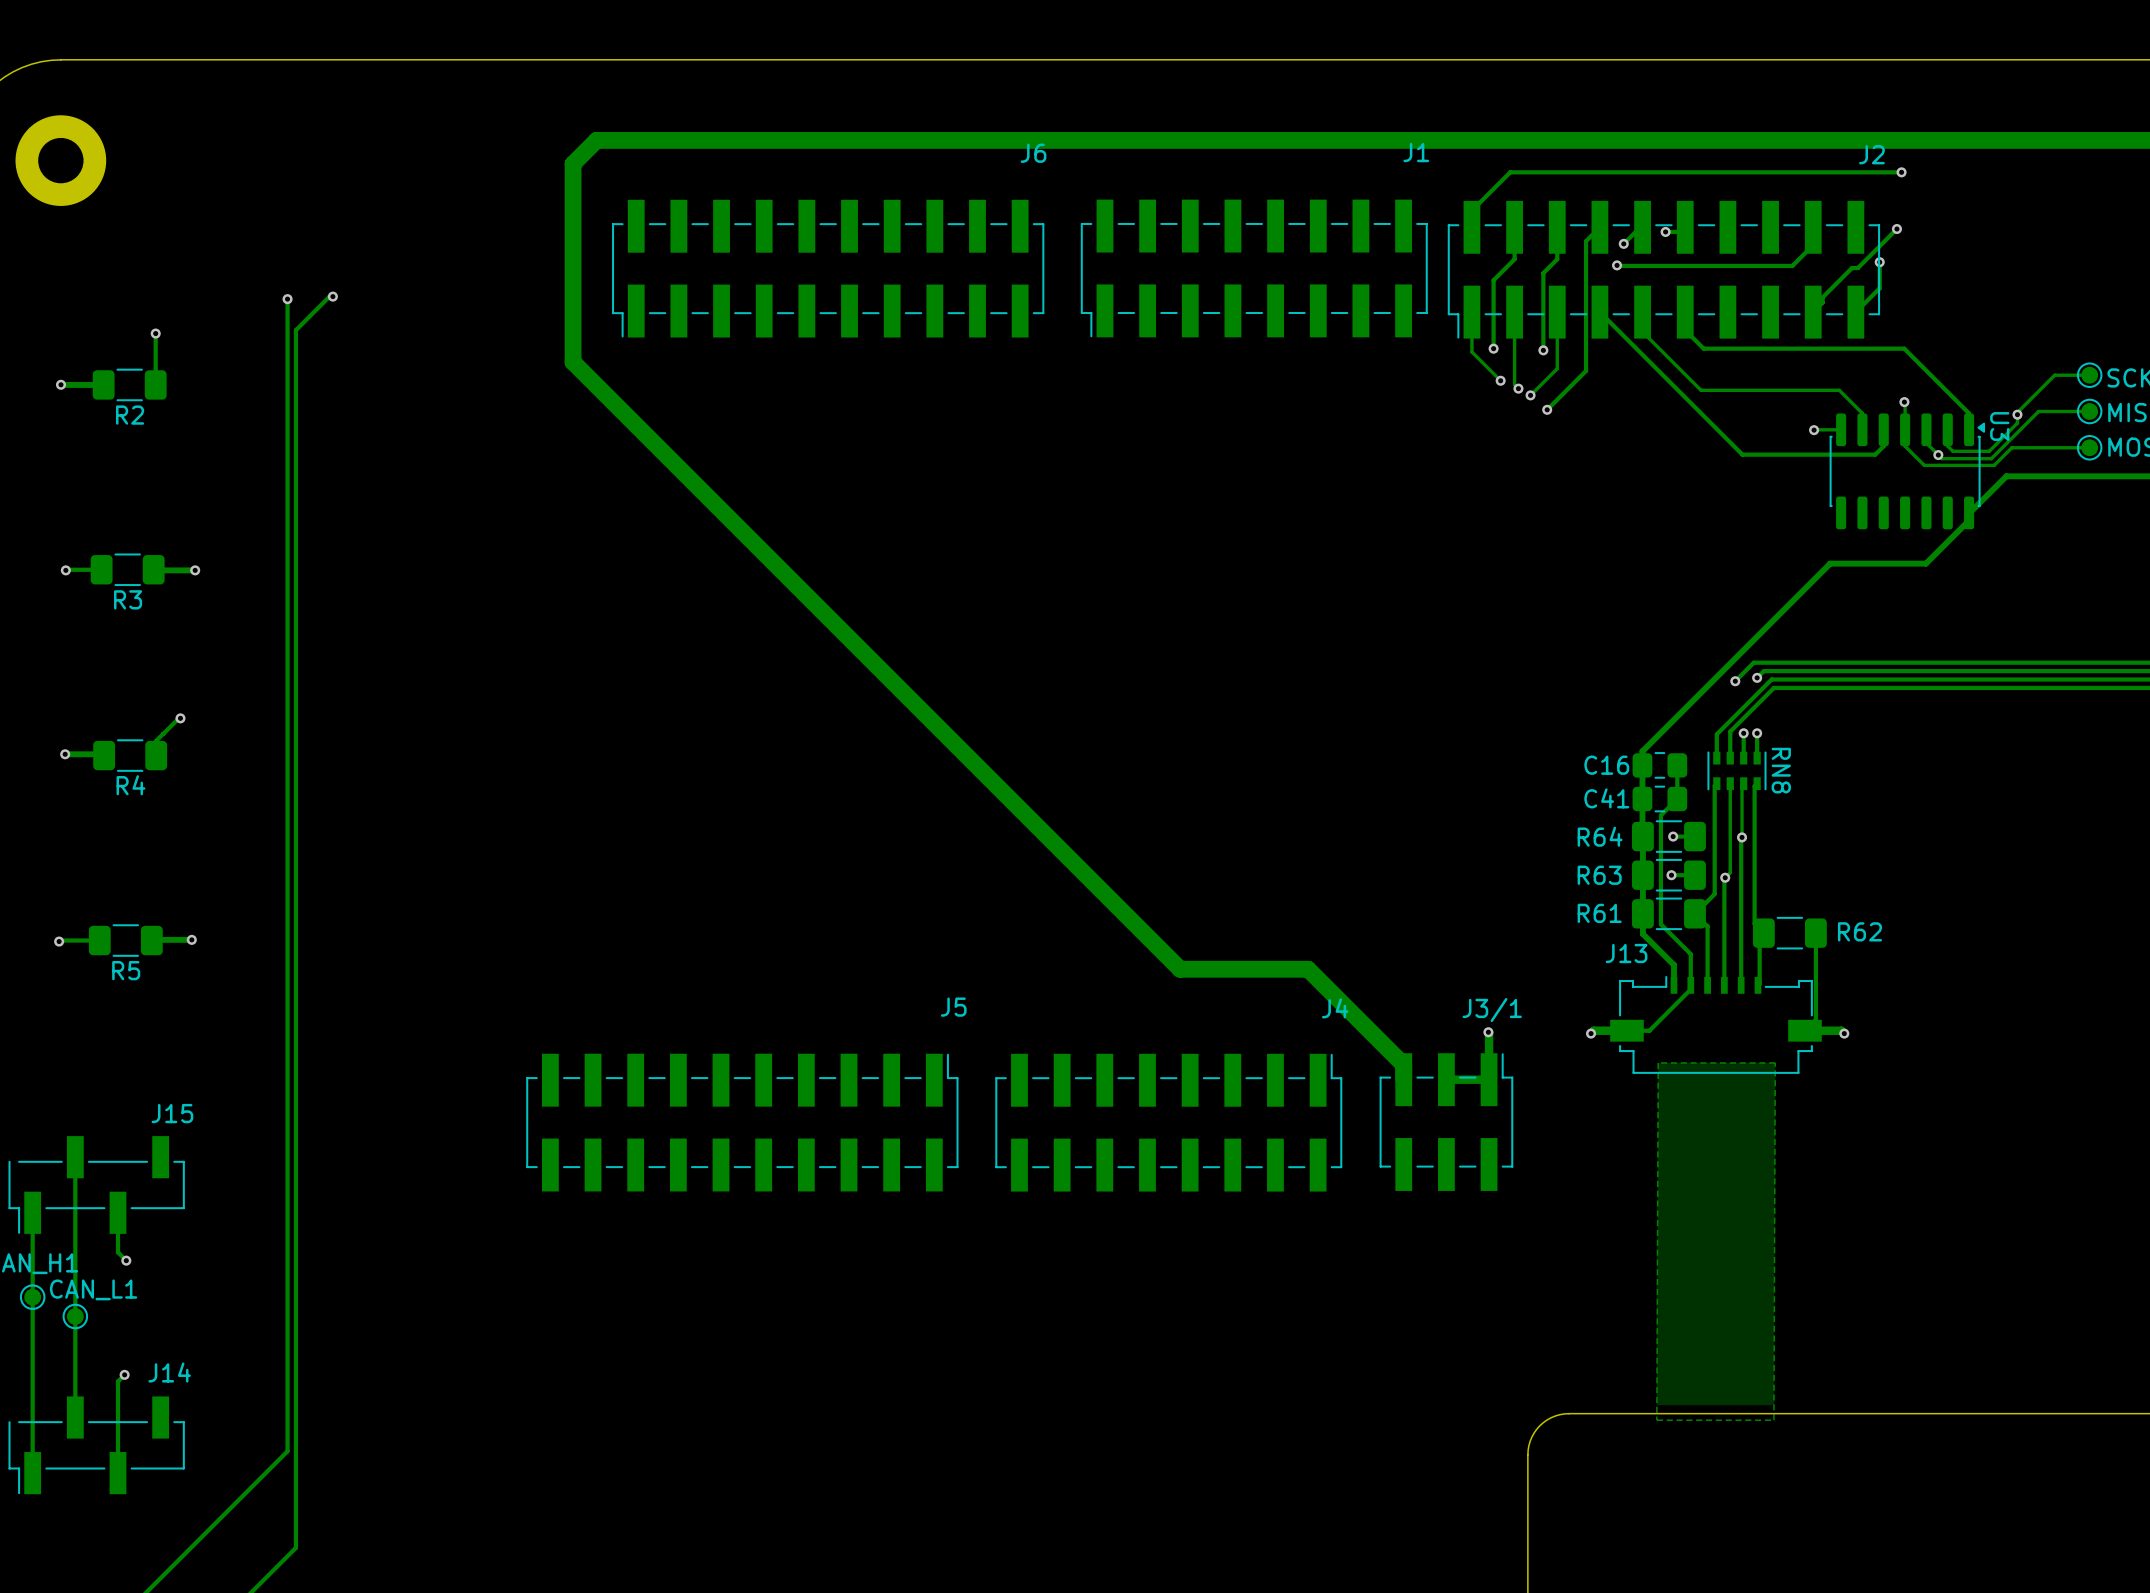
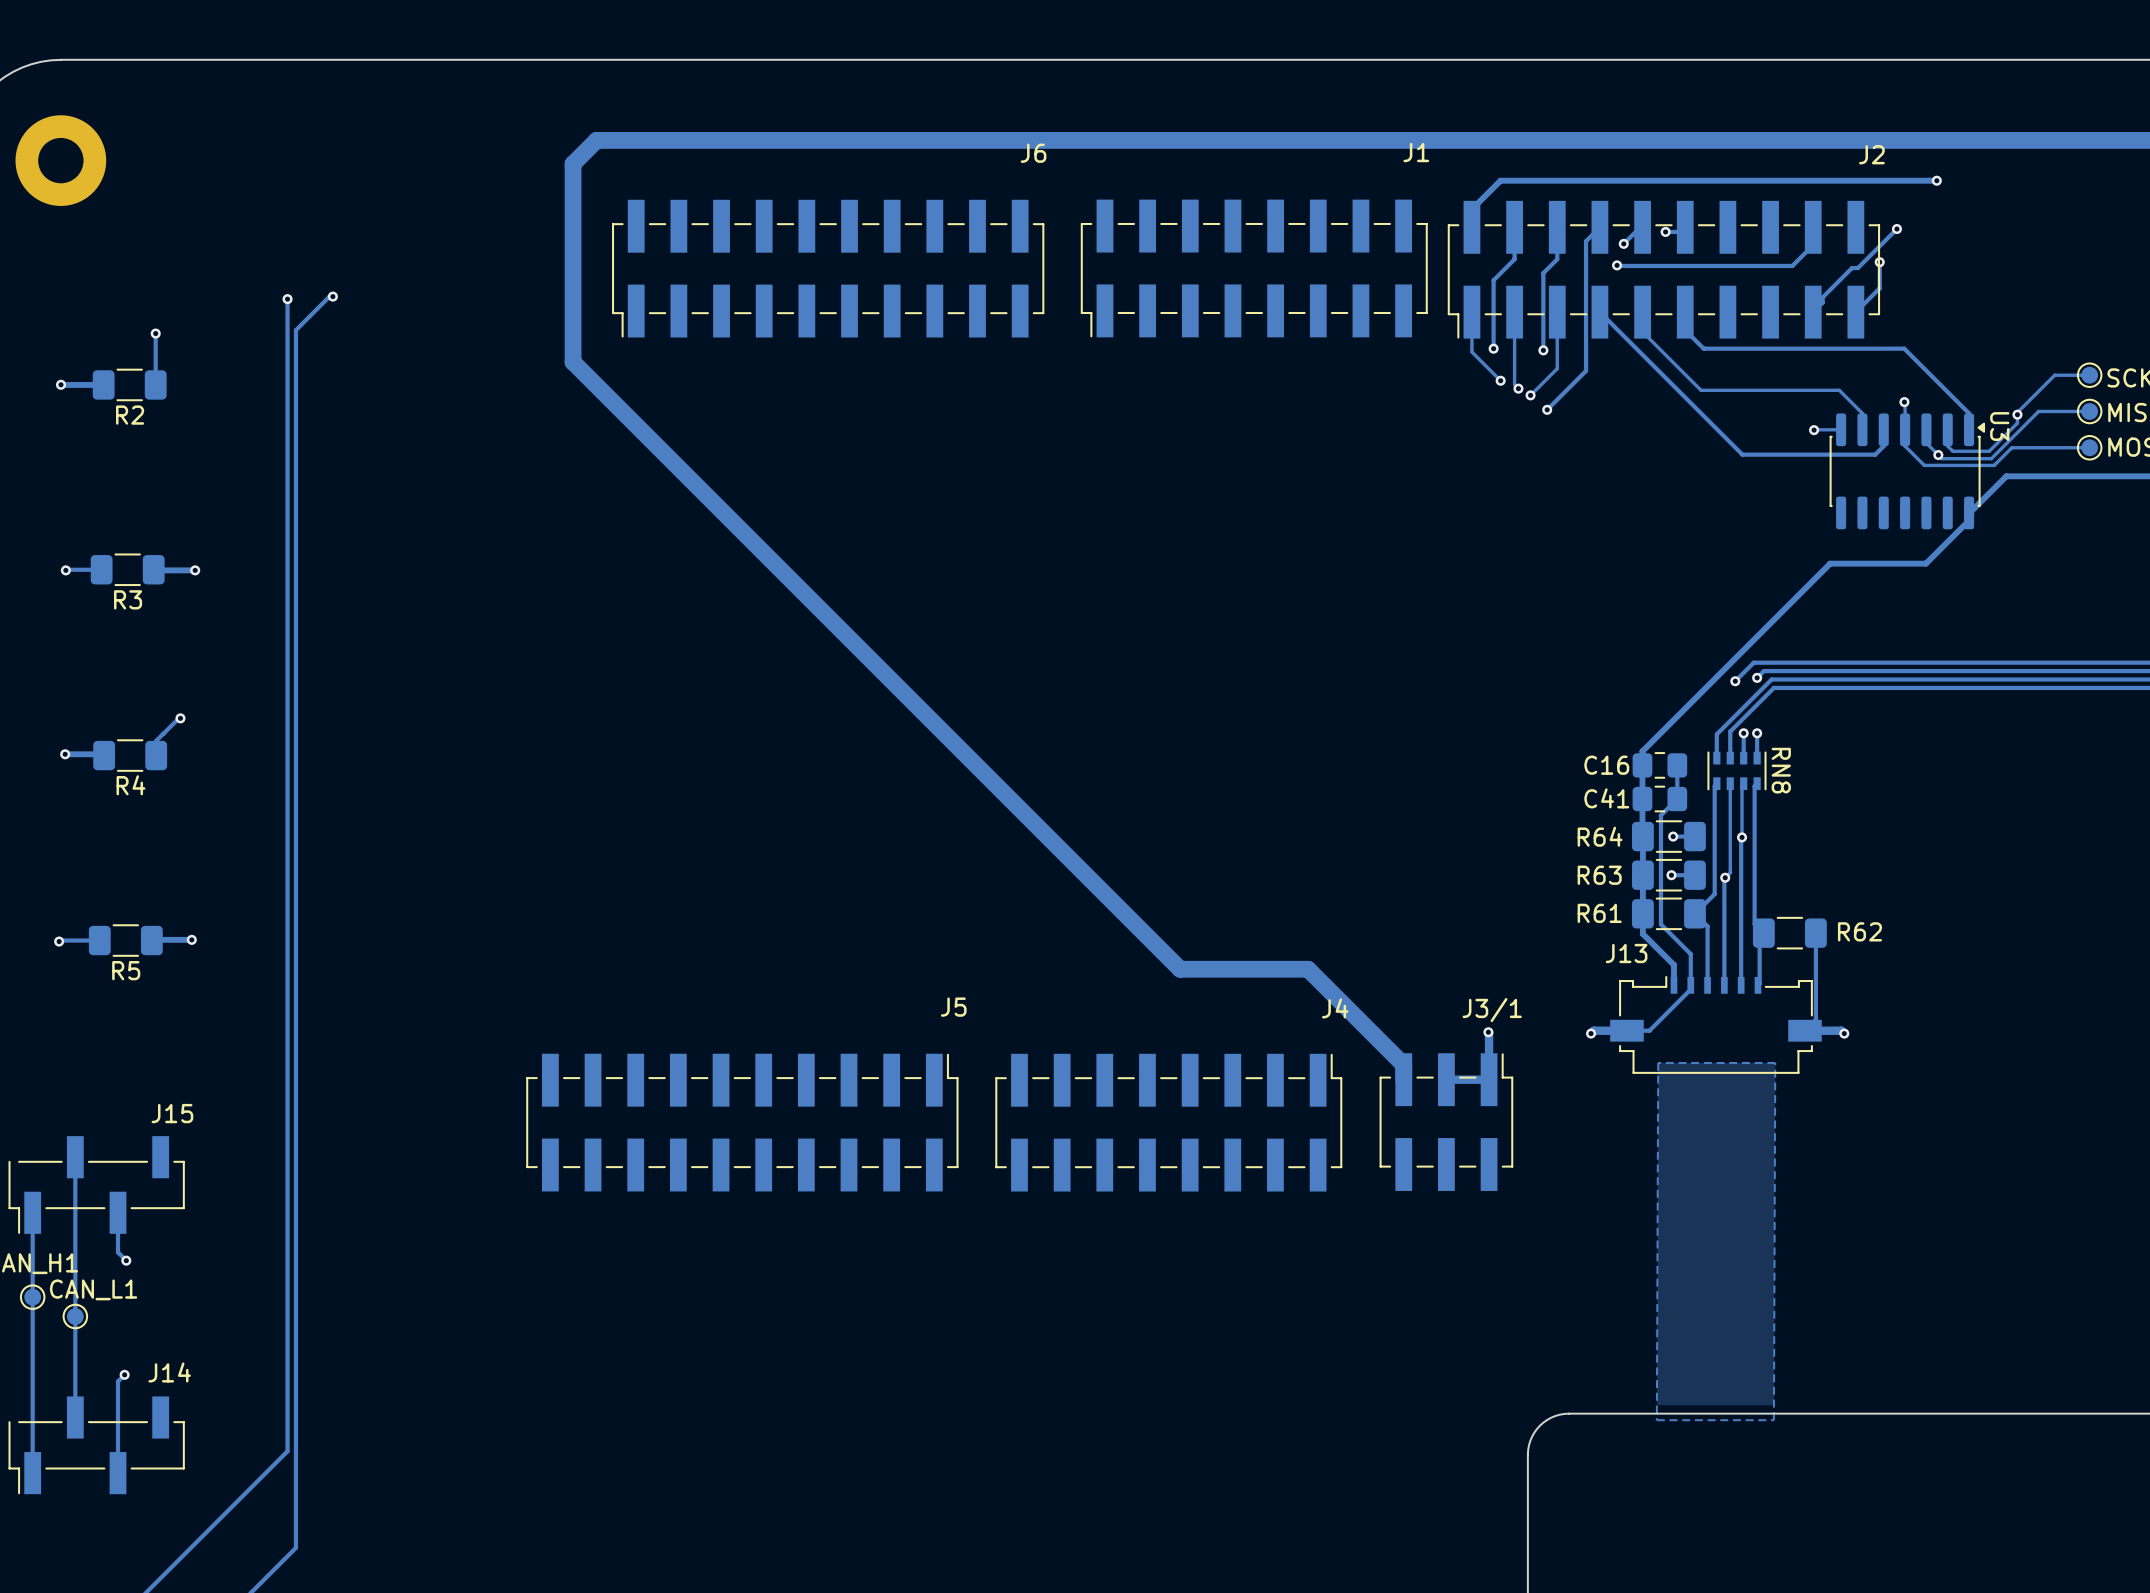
track: (1901, 172) (1510, 172) (1471, 210) -> (1936, 180) (1500, 180) (1471, 210)
via position: (1901, 172) -> (1936, 180)

